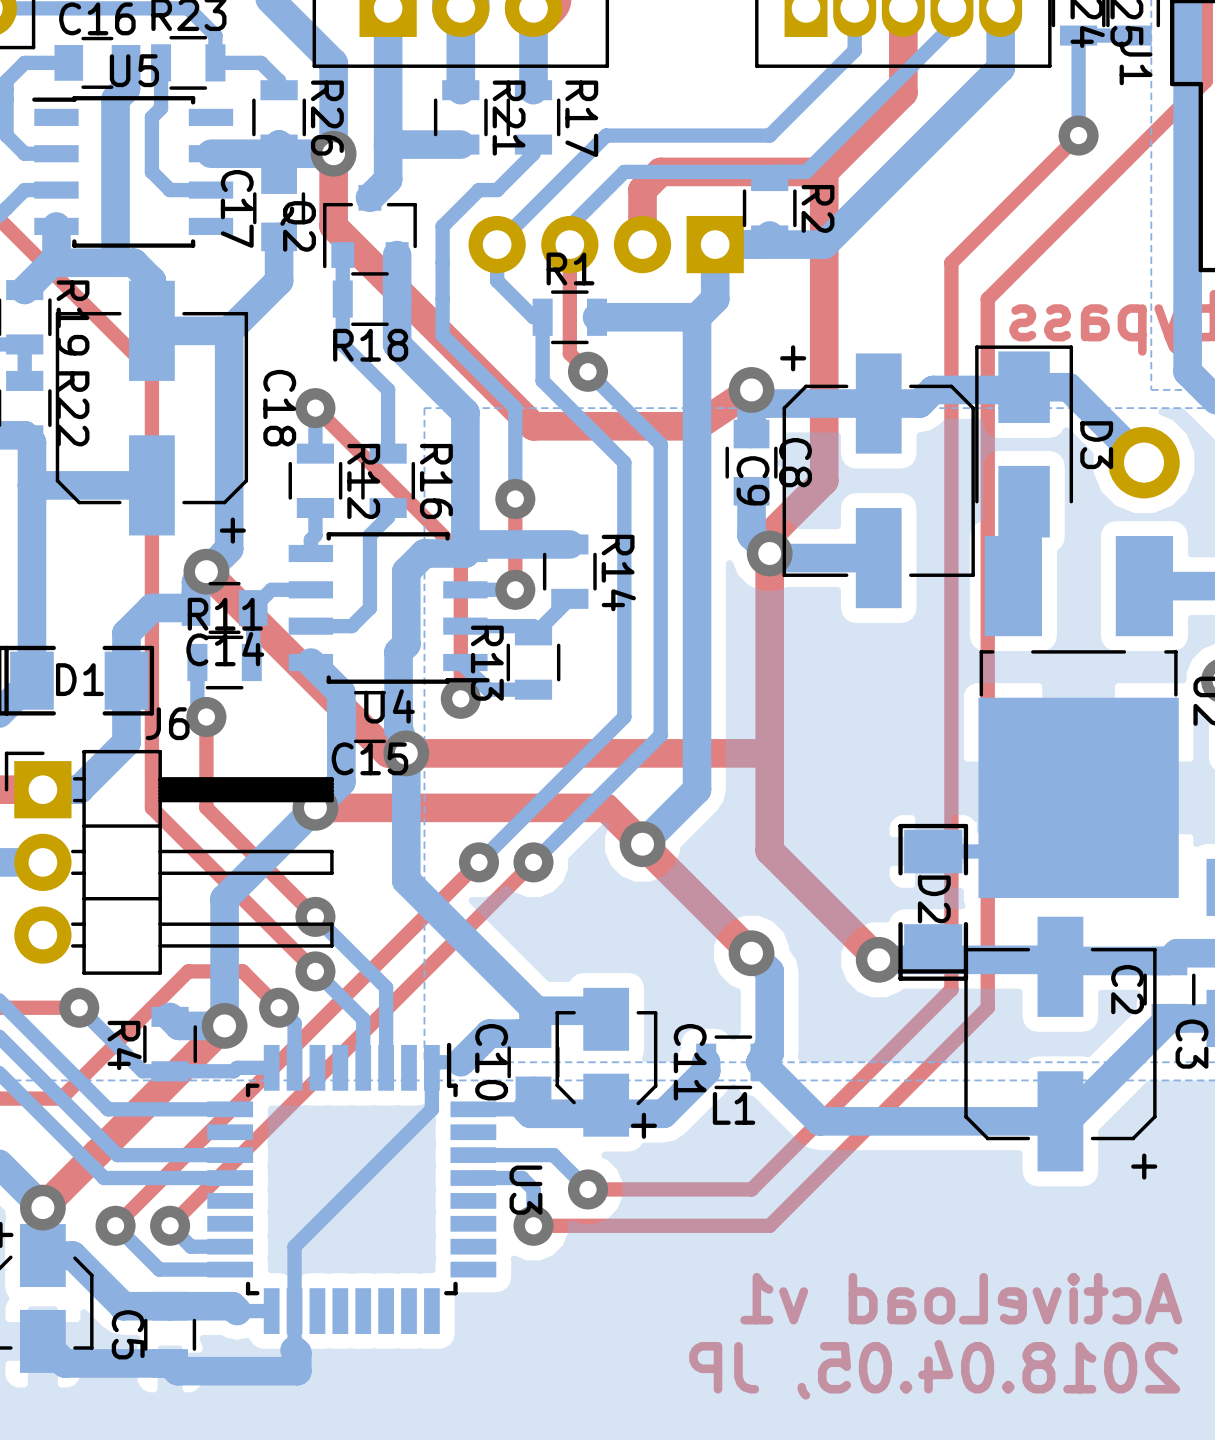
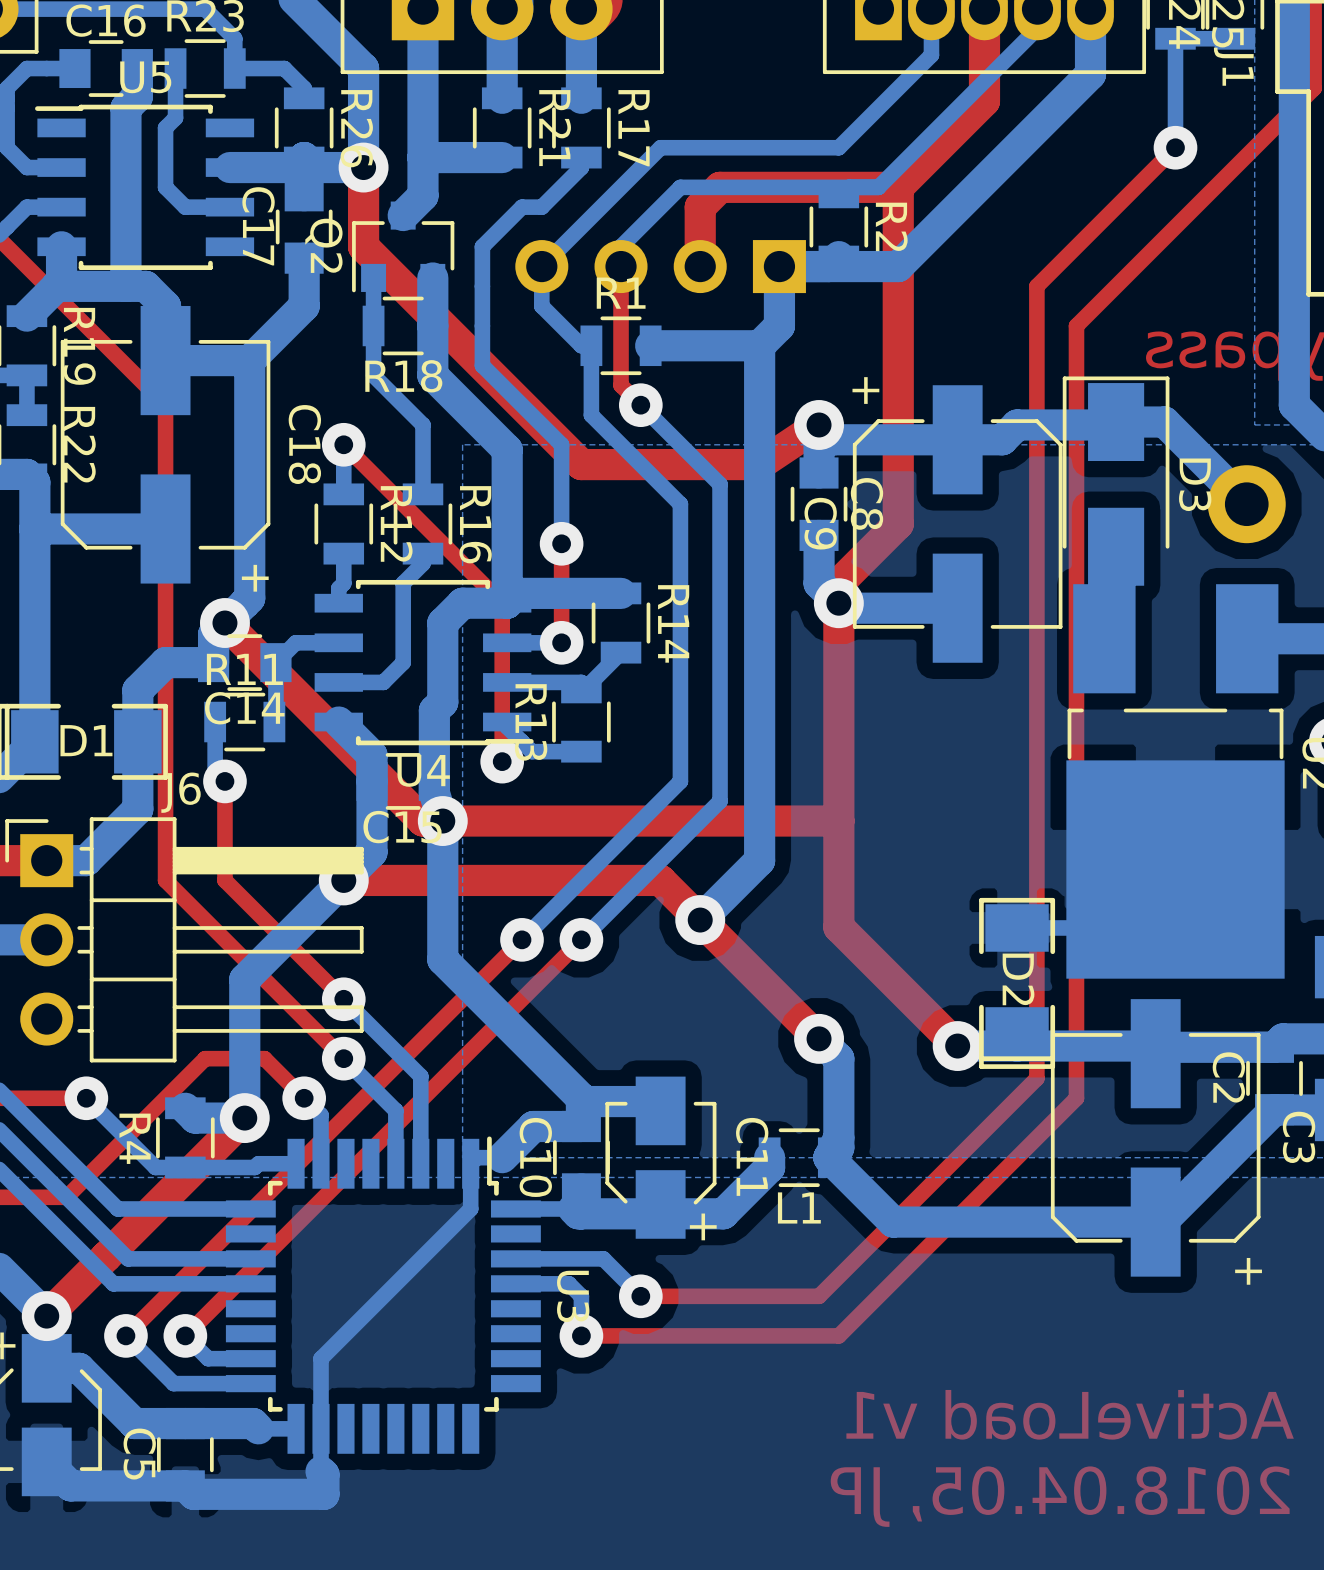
part footprint: [468, 215, 744, 274] -> [515, 240, 806, 294]
J6 footprint: [4, 749, 334, 975] -> [5, 817, 364, 1063]

